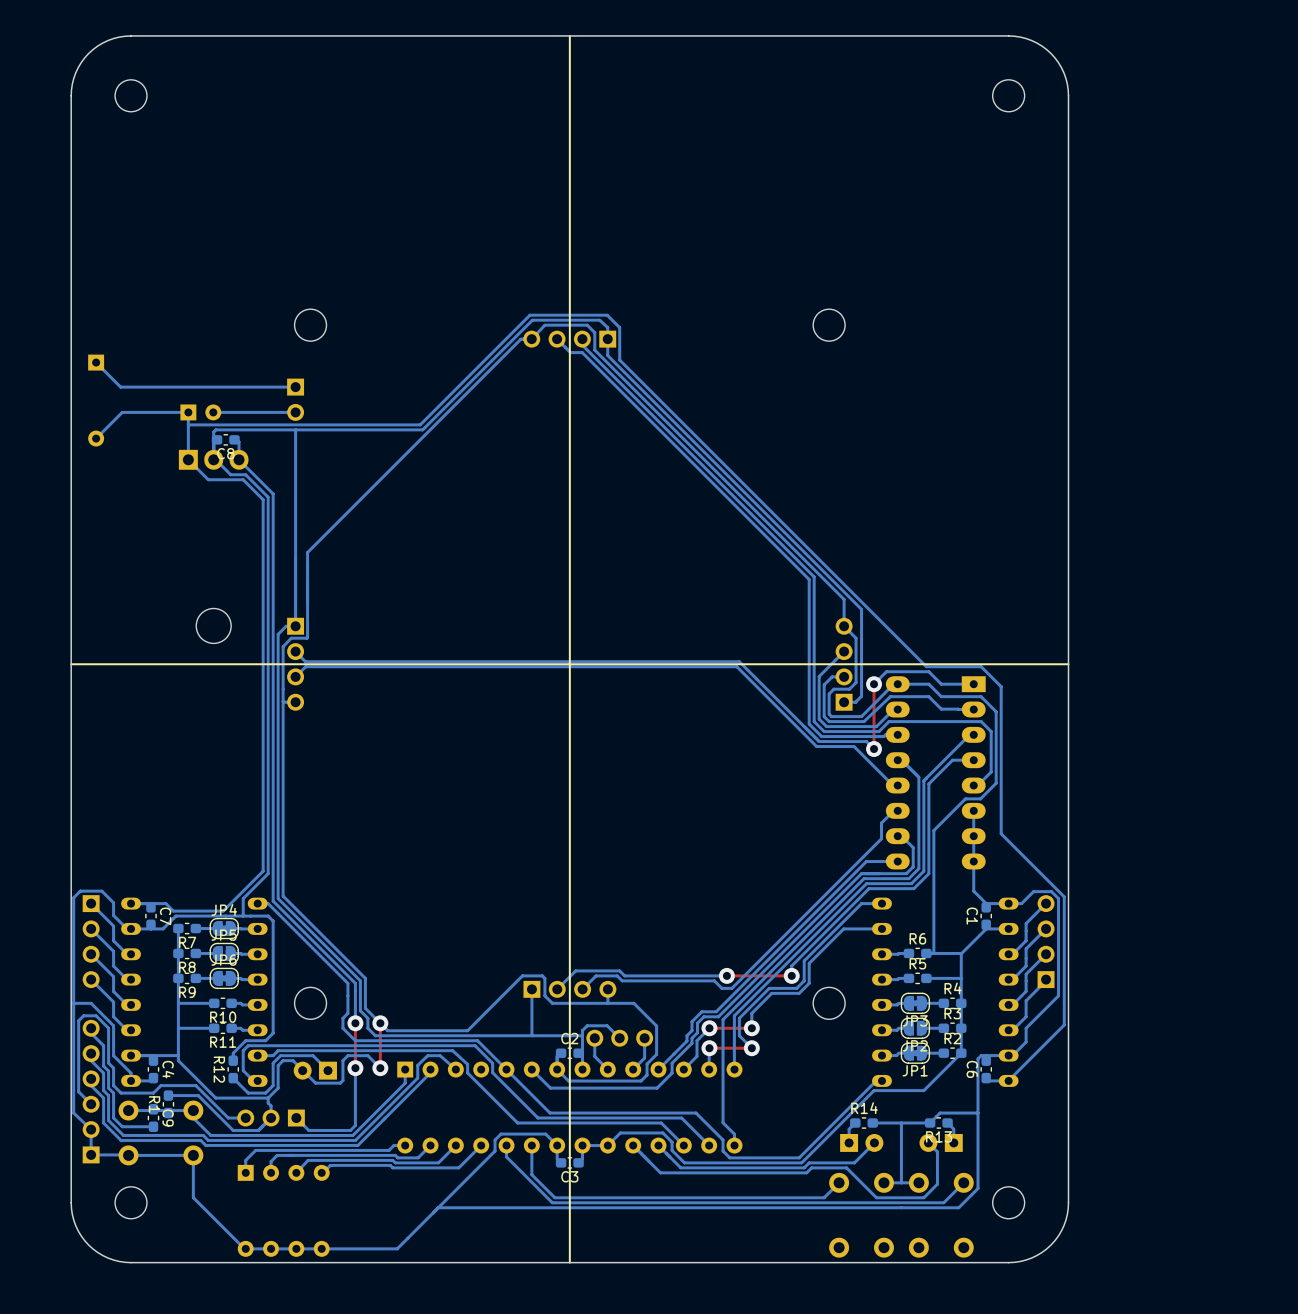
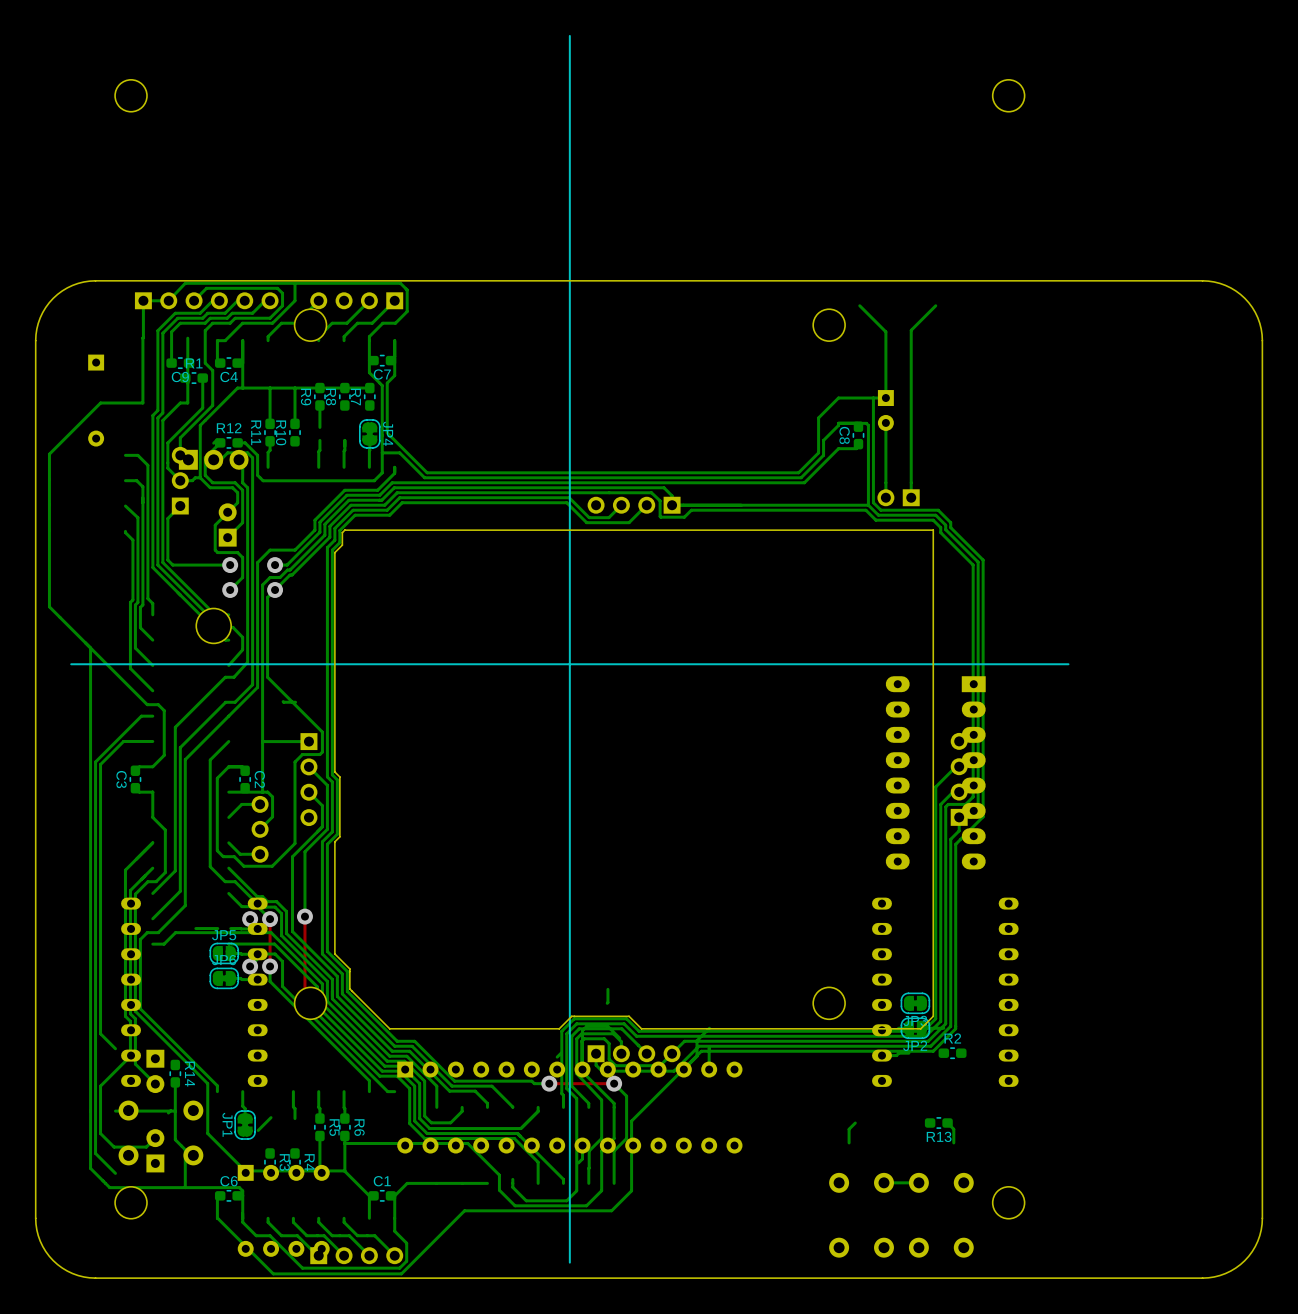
board edge: (1008, 35) (131, 35) (119, 37) (102, 43) (84, 57) (75, 72) (71, 95) (71, 1202) (75, 1225) (84, 1240) (93, 1249) (108, 1258) (131, 1262) (1008, 1262) (1031, 1258) (1046, 1249) (1054, 1240) (1065, 1220) (1068, 1202) (1068, 95) (1063, 72) (1050, 53) (1031, 40) (1008, 35) -> (1202, 280) (1225, 285) (1244, 298) (1257, 317) (1262, 340) (1262, 1218) (1259, 1235) (1255, 1246) (1240, 1264) (1225, 1273) (1202, 1278) (95, 1278) (72, 1273) (62, 1268) (49, 1256) (40, 1241) (35, 1218) (35, 340) (40, 317) (49, 302) (57, 294) (72, 285) (95, 280) (1202, 280)
bottom track: none -> (295, 283) (295, 300) (272, 323) (242, 323) (225, 340) (217, 340) (217, 360) (220, 363)
bottom track: none -> (194, 300) (206, 288) (277, 288) (282, 293) (282, 305) (270, 318) (235, 318) (230, 323) (212, 323) (205, 330) (205, 363) (212, 370) (212, 405) (180, 437) (180, 455)
part: none -> (206, 300)
bottom track: none -> (219, 300) (212, 300) (200, 313) (175, 313) (157, 330) (157, 410) (152, 415) (152, 567) (225, 640) (228, 640)
bottom track: none -> (244, 300) (237, 300) (225, 313) (207, 313) (202, 318) (177, 318) (162, 333) (162, 412) (157, 417) (157, 565) (220, 627) (232, 627) (242, 637) (242, 649) (228, 665)
bottom track: none -> (270, 300) (265, 300) (252, 313) (232, 313) (227, 318) (210, 318) (205, 323) (180, 323) (171, 331) (171, 363)
bottom track: none -> (318, 300) (296, 323) (281, 323) (268, 336) (268, 340)
part: none -> (356, 300)
bottom track: none -> (369, 300) (346, 323) (332, 323) (318, 336) (318, 340)
bottom track: none -> (394, 300) (372, 323) (357, 323) (344, 336) (344, 340)
bottom track: none -> (859, 305) (885, 331) (885, 398) (838, 398) (818, 417) (818, 452) (798, 472) (427, 472) (387, 432) (387, 383) (394, 375) (394, 340)
bottom track: none -> (935, 305) (911, 330) (911, 497)
bottom track: none -> (142, 338) (142, 403) (100, 403) (49, 454) (49, 606) (147, 704) (158, 704) (164, 710) (164, 755) (152, 766) (139, 766) (135, 770)
bottom track: none -> (142, 338) (143, 300) (168, 300) (185, 283) (400, 283) (407, 290) (407, 311) (395, 323) (382, 323) (369, 336) (369, 372) (382, 385) (382, 472) (374, 480) (263, 480) (257, 475) (257, 455) (245, 442) (237, 442)
bottom track: none -> (187, 338) (187, 403) (180, 403) (162, 420) (162, 562) (215, 614) (228, 614)
bottom track: (557, 339) (570, 352) (582, 352) (809, 579) (809, 724) (821, 736) (897, 734) -> none
part: (569, 339) -> none
bottom track: (582, 339) (582, 345) (814, 576) (814, 721) (824, 731) (879, 731) (888, 721) (981, 721) (991, 731) (991, 772) (977, 785) (969, 785) -> none
bottom track: none -> (242, 340) (242, 387)
bottom track: (96, 362) (120, 387) (295, 387) -> none
bottom track: none -> (202, 378) (202, 407) (167, 442) (167, 468) (180, 480) (192, 480) (195, 477) (200, 477)
bottom track: none -> (270, 388) (270, 423)
bottom track: none -> (295, 388) (295, 423)
bottom track: none -> (369, 388) (237, 388) (200, 425) (200, 477)
bottom track: none -> (873, 398) (873, 502) (880, 510) (938, 510) (950, 522) (950, 527) (983, 560) (983, 816) (955, 844) (955, 1028) (933, 1051) (701, 1051) (631, 1121) (631, 1190) (611, 1210) (464, 1210) (401, 1273) (273, 1273) (217, 1218) (217, 1198) (220, 1195)
part: (295, 399) -> none
bottom track: none -> (319, 405) (319, 427)
part: none -> (885, 410)
part: (200, 412) -> none
bottom track: (295, 412) (213, 412) -> none
bottom track: none -> (885, 422) (885, 497)
bottom track: (188, 424) (420, 424) (529, 315) (607, 315) (619, 327) (619, 360) (926, 666) (981, 666) (1001, 686) (1001, 833) (1064, 896) (1064, 1025) (1008, 1080) (989, 1080) (986, 1078) -> none
bottom track: (295, 429) (295, 626) (286, 626) (278, 634) (278, 898) (360, 980) (360, 1010) (367, 1018) (367, 1028) (375, 1035) (582, 1035) -> none
bottom track: (234, 437) (239, 441) (239, 459) (273, 493) (273, 901) (355, 983) (355, 1023) -> none
bottom track: (96, 438) (122, 412) (188, 412) (188, 459) (208, 479) (243, 479) (263, 499) (263, 871) (223, 911) (173, 911) (165, 903) (131, 903) -> none
C8 rotation: 0° (225, 439) -> 90° clockwise (858, 435)
C8 position: (225, 439) -> (858, 435)
bottom track: none -> (319, 440) (318, 467)
bottom track: none -> (344, 440) (344, 467)
bottom track: none -> (369, 440) (369, 467)
bottom track: none -> (270, 441) (268, 467)
bottom track: none -> (220, 442) (205, 457) (205, 475) (212, 482) (235, 482) (242, 490) (242, 522) (227, 537)
bottom track: none -> (860, 444) (856, 448) (838, 448) (804, 482) (392, 482) (379, 495) (346, 495) (319, 522) (319, 532) (287, 565) (275, 565)
bottom track: none -> (382, 452) (399, 452) (424, 477) (801, 477) (823, 455) (823, 440) (838, 423) (866, 423) (868, 425) (868, 505)
bottom track: none -> (125, 455) (137, 455) (147, 465) (147, 598) (152, 603) (152, 614)
bottom track: none -> (217, 467) (217, 463) (227, 452) (247, 452) (252, 457) (252, 684) (235, 702) (225, 702) (180, 747) (180, 891) (152, 918)
bottom track: none -> (242, 467) (242, 482) (247, 487) (247, 662) (233, 677) (225, 677) (175, 727) (175, 870) (152, 893)
bottom track: none -> (394, 467) (394, 473) (377, 490) (344, 490) (314, 520) (314, 530) (295, 550) (270, 550) (257, 562) (257, 687) (185, 759) (185, 905) (158, 932) (147, 932) (140, 939) (140, 1008) (217, 1085) (217, 1091)
bottom track: none -> (200, 477) (210, 487) (232, 487) (237, 492) (237, 502) (215, 525) (215, 550) (217, 552) (237, 552) (242, 557) (242, 577) (230, 589)
bottom track: none -> (125, 480) (136, 480) (142, 486) (142, 604) (140, 607) (140, 627) (152, 640)
part: none -> (180, 480)
part: none -> (898, 497)
bottom track: none -> (621, 505) (608, 517) (589, 517) (569, 497) (399, 497) (387, 510) (353, 510) (334, 528) (334, 540) (327, 547) (327, 776) (332, 781) (332, 831) (322, 841) (322, 954) (342, 973) (342, 993) (394, 1046) (412, 1046) (452, 1086) (491, 1086) (512, 1107)
part: none -> (634, 505)
bottom track: none -> (646, 505) (629, 522) (586, 522) (566, 502) (402, 502) (389, 515) (355, 515) (339, 530) (339, 542) (332, 550) (332, 774) (337, 779) (337, 834) (327, 844) (327, 951) (347, 971) (347, 991) (397, 1041) (414, 1041) (454, 1081) (531, 1081) (534, 1083) (549, 1083)
bottom track: none -> (868, 505) (672, 505) (672, 495) (664, 487) (394, 487) (381, 500) (348, 500) (324, 524) (324, 535) (290, 570) (280, 577) (270, 577) (262, 585) (262, 792)
bottom track: none -> (868, 505) (878, 515) (935, 515) (945, 525) (945, 529) (978, 562) (978, 809) (970, 817) (959, 817) (959, 830) (950, 839) (950, 1026) (930, 1046) (698, 1046) (673, 1071) (602, 1071) (596, 1065) (596, 1053)
bottom track: none -> (125, 506) (137, 517) (137, 602) (135, 604) (135, 648) (152, 665)
bottom track: none -> (180, 506) (167, 518) (167, 560) (172, 565) (230, 565)
part: none -> (227, 524)
board edge: none -> (933, 530) (933, 1016) (920, 1028) (641, 1028) (629, 1016) (571, 1016) (559, 1028) (389, 1028) (349, 988) (349, 968) (334, 954) (334, 841) (339, 836) (339, 776) (334, 772) (334, 552) (342, 545) (342, 532) (344, 530) (933, 530)
bottom track: none -> (125, 531) (132, 540) (130, 668) (152, 690)
via: none -> (230, 565)
via: none -> (275, 565)
via: none -> (230, 589)
via: none -> (275, 589)
bottom track: none -> (90, 647) (90, 1168) (109, 1187) (239, 1187) (242, 1190) (242, 1222) (256, 1235) (270, 1235) (302, 1268) (399, 1268) (406, 1261) (406, 1243) (394, 1231) (394, 1195) (407, 1183) (487, 1183)
bottom track: (295, 651) (305, 661) (739, 661) (819, 741) (866, 741) (874, 749) -> none
bottom track: (844, 651) (819, 676) (819, 719) (826, 726) (876, 726) (893, 709) (897, 709) -> none
part position: (295, 664) -> (308, 779)
part: (844, 664) -> none
bottom track: (295, 676) (305, 666) (736, 666) (816, 746) (854, 746) (893, 785) (897, 785) -> none
bottom track: (844, 676) (832, 676) (824, 684) (824, 716) (829, 721) (864, 721) (890, 696) (928, 696) (941, 709) (973, 709) -> none
top track: (874, 684) (874, 749) -> none
via: (874, 684) -> none
bottom track: (973, 684) (941, 684) (928, 671) (886, 671) (874, 684) -> none
bottom track: (844, 702) (855, 702) (861, 696) (861, 609) (607, 355) (607, 327) (599, 320) (532, 320) (422, 429) (215, 429) (213, 431) (213, 459) (230, 474) (245, 474) (268, 497) (268, 873) (243, 898) (243, 916) -> none
bottom track: none -> (152, 716) (141, 716) (95, 762) (95, 1153) (115, 1173)
bottom track: (973, 734) (969, 734) (923, 780) (923, 871) (911, 883) (866, 883) (734, 1015) (734, 1069) -> none
bottom track: none -> (152, 741) (123, 741) (100, 764) (100, 1033) (115, 1048)
bottom track: none -> (228, 741) (210, 760) (210, 866) (225, 881) (235, 881) (255, 901) (260, 901) (265, 907) (275, 907) (281, 913) (281, 935) (327, 981) (327, 1001) (387, 1061) (404, 1061) (424, 1081) (424, 1116) (431, 1122) (450, 1122) (462, 1111) (462, 1107)
bottom track: none -> (308, 741) (262, 742)
via: (874, 749) -> none
bottom track: (897, 760) (901, 760) (918, 777) (918, 868) (908, 878) (864, 878) (723, 1019) (723, 1122) (734, 1134) (734, 1145) -> none
bottom track: (973, 760) (952, 760) (928, 783) (928, 873) (913, 888) (869, 888) (791, 965) (791, 975) -> none
bottom track: none -> (308, 766) (327, 785) (327, 829) (304, 851) (304, 916)
bottom track: none -> (959, 766) (956, 766) (935, 786) (935, 1018) (923, 1031) (639, 1031) (626, 1018) (574, 1018) (561, 1031) (563, 1107)
bottom track: none -> (245, 769) (242, 766) (228, 766) (217, 778) (217, 850) (223, 856) (234, 856) (243, 866) (272, 866) (295, 843) (295, 762) (302, 754) (319, 754) (322, 752) (322, 732) (267, 677) (267, 597) (329, 537) (329, 526) (351, 505) (384, 505) (397, 492) (651, 492) (660, 500) (660, 517) (684, 517) (691, 510) (865, 510) (875, 520) (933, 520) (940, 527) (940, 532) (973, 565) (973, 796) (965, 804) (948, 804) (945, 806) (945, 1023) (928, 1041) (684, 1041) (660, 1065) (615, 1065) (609, 1059) (609, 1043) (604, 1038) (584, 1038) (581, 1041) (581, 1071) (614, 1103) (614, 1138) (601, 1150) (601, 1190) (586, 1205) (515, 1205) (499, 1190) (499, 1175) (467, 1143) (344, 1143)
part: none -> (959, 779)
bottom track: none -> (135, 788) (139, 792) (152, 792)
bottom track: none -> (152, 792) (152, 817) (165, 830) (165, 872) (156, 881) (147, 881) (135, 894) (135, 1011) (207, 1083) (207, 1133) (245, 1170) (344, 1170)
bottom track: none -> (228, 792) (267, 792) (272, 796) (272, 816) (260, 829)
bottom track: none -> (308, 792) (322, 805) (322, 826) (292, 856) (292, 931) (337, 976) (337, 996) (392, 1051) (409, 1051) (449, 1091) (475, 1091) (487, 1103) (487, 1107)
bottom track: none -> (959, 792) (953, 792) (940, 804) (940, 1021) (925, 1036) (636, 1036) (624, 1023) (576, 1023) (566, 1033) (566, 1088) (576, 1098) (576, 1190) (566, 1200) (526, 1200) (512, 1187) (512, 1179)
bottom track: none -> (260, 804) (241, 804) (228, 817)
bottom track: (897, 810) (893, 810) (881, 823) (881, 838) (731, 988) (721, 988) (714, 980) (622, 980) (617, 975) (596, 975) (582, 989) -> none
bottom track: (973, 810) (973, 891) (986, 903) (1021, 903) (1033, 891) (1051, 891) (1058, 898) (1058, 995) (1026, 1028) (1026, 1042) (1012, 1055) (981, 1055) (978, 1058) (978, 1188) (958, 1207) (438, 1207) -> none
part: none -> (260, 829)
bottom track: (897, 836) (901, 836) (913, 847) (913, 866) (906, 873) (861, 873) (718, 1016) (703, 1016) (697, 1023) (697, 1032) (692, 1038) (692, 1043) (672, 1063) (672, 1073) (657, 1088) (550, 1088) (531, 1069) -> none
bottom track: none -> (152, 842) (125, 870) (125, 1016) (130, 1021) (130, 1056) (100, 1086) (100, 1133) (114, 1147) (146, 1147) (155, 1138)
bottom track: none -> (228, 842) (240, 854) (260, 854)
bottom track: (897, 861) (866, 861) (716, 1011) (701, 1011) (692, 1021) (692, 1030) (687, 1035) (687, 1041) (658, 1069) -> none
bottom track: none -> (152, 868) (130, 890) (130, 1013) (135, 1018) (135, 1064) (155, 1084)
bottom track: none -> (228, 868) (257, 896) (262, 896) (267, 901) (276, 901) (286, 911) (286, 933) (332, 979) (332, 998) (389, 1056) (406, 1056) (436, 1086) (436, 1107)
bottom track: none -> (228, 893) (241, 906) (257, 906) (270, 919)
bottom track: (91, 903) (113, 926) (113, 940) (127, 954) (131, 954) -> none
bottom track: (257, 903) (268, 903) (347, 983) (347, 1013) (342, 1018) (342, 1028) (355, 1040) (477, 1040) (506, 1069) -> none
bottom track: (882, 903) (861, 903) (804, 960) (804, 980) (796, 988) (769, 988) (739, 1018) (739, 1035) (751, 1048) -> none
bottom track: (1046, 903) (1026, 923) (1026, 940) (1012, 954) (1008, 954) -> none
C7 rotation: 0° (150, 916) -> 90° clockwise (382, 360)
C7 position: (150, 916) -> (382, 360)
top track: none -> (304, 916) (304, 991)
via: none -> (304, 916)
C1 rotation: 0° (986, 916) -> 90° clockwise (382, 1195)
C1 position: (986, 916) -> (382, 1195)
via: none -> (250, 919)
via: none -> (270, 919)
bottom track: (91, 928) (113, 951) (113, 966) (127, 979) (131, 979) -> none
bottom track: (178, 928) (178, 1060) (215, 1098) (268, 1098) -> none
R7 rotation: 0° (187, 928) -> 90° clockwise (369, 396)
R7 position: (187, 928) -> (369, 396)
JP4 rotation: 0° (224, 928) -> 90° clockwise (369, 433)
JP4 position: (224, 928) -> (369, 433)
bottom track: (882, 928) (843, 928) (809, 963) (809, 983) (799, 993) (771, 993) (751, 1013) (751, 1028) -> none
bottom track: (1008, 928) (986, 928) (961, 953) -> none
bottom track: (1046, 928) (1026, 948) (1026, 966) (1012, 979) (1008, 979) -> none
part: (91, 941) -> none
part: (1046, 941) -> none
bottom track: none -> (152, 944) (164, 944) (175, 932) (271, 932) (322, 983) (322, 1003) (384, 1066) (402, 1066) (419, 1083) (419, 1118) (429, 1128) (520, 1128) (538, 1111) (538, 1107)
bottom track: none -> (228, 944) (274, 944) (317, 986) (317, 1006) (382, 1071) (399, 1071) (414, 1086) (414, 1121) (427, 1133) (517, 1133) (563, 1179) (563, 1183)
R8 rotation: 0° (187, 953) -> 90° clockwise (344, 396)
R8 position: (187, 953) -> (344, 396)
bottom track: (217, 953) (195, 953) -> none
bottom track: (908, 953) (882, 954) -> none
R6 rotation: 0° (917, 953) -> 90° clockwise (344, 1127)
R6 position: (917, 953) -> (344, 1127)
bottom track: (926, 953) (961, 953) -> none
bottom track: (933, 953) (933, 830) (965, 798) (980, 798) (996, 783) (996, 711) (981, 696) (941, 696) (928, 684) (893, 684) (861, 716) (831, 716) (829, 714) (829, 693) (833, 689) (849, 689) (856, 682) (856, 638) (844, 626) (844, 599) (594, 350) (594, 332) (587, 325) (544, 325) (531, 339) (520, 339) (307, 552) (307, 637) (291, 638) (283, 646) (283, 896) (365, 978) (365, 1008) (387, 1030) (467, 1030) (522, 975) (542, 975) (544, 978) (544, 995) (552, 1003) (633, 1003) (656, 1026) (656, 1054) (647, 1064) (647, 1075) (641, 1081) (568, 1081) (557, 1069) (557, 1055) (559, 1053) -> none
bottom track: (961, 953) (961, 1053) (923, 1090) (874, 1090) (801, 1162) (684, 1162) (672, 1150) (672, 1142) (662, 1132) (620, 1132) (607, 1145) (582, 1145) -> none
bottom track: (91, 954) (113, 976) (113, 991) (127, 1004) (131, 1004) -> none
bottom track: (1046, 954) (1026, 974) (1026, 991) (1012, 1004) (1008, 1004) -> none
bottom track: none -> (270, 963) (270, 981) (369, 1080) (369, 1091)
bottom track: none -> (250, 966) (262, 954) (275, 954) (282, 961) (282, 986) (387, 1091) (394, 1091)
via: none -> (250, 966)
via: none -> (270, 966)
bottom track: (726, 975) (624, 975) (619, 970) (575, 970) (557, 989) -> none
via: (726, 975) -> none
top track: (791, 975) (726, 975) -> (614, 1083) (549, 1083)
via: (791, 975) -> none
R9 rotation: 0° (187, 978) -> 90° clockwise (319, 396)
R9 position: (187, 978) -> (319, 396)
bottom track: (217, 978) (195, 978) -> none
bottom track: (908, 978) (882, 979) -> none
R5 rotation: 0° (917, 978) -> 90° clockwise (319, 1127)
R5 position: (917, 978) -> (319, 1127)
bottom track: (961, 978) (926, 978) -> none
bottom track: (91, 979) (113, 1002) (113, 1016) (127, 1030) (131, 1030) -> none
bottom track: (1048, 979) (1026, 1000) (1026, 1016) (1012, 1030) (1008, 1030) -> none
bottom track: (531, 989) (532, 1035) -> none
part position: (569, 989) -> (634, 1053)
bottom track: none -> (304, 991) (304, 1001) (379, 1076) (397, 1076) (409, 1088) (409, 1123) (424, 1138) (514, 1138) (538, 1162) (538, 1183)
bottom track: (73, 1003) (91, 1003) (113, 1025) (113, 1055) (131, 1073) (131, 1080) (150, 1080) (153, 1078) -> none
bottom track: (214, 1003) (178, 1003) -> none
R10 rotation: 0° (222, 1003) -> 90° clockwise (295, 432)
R10 position: (222, 1003) -> (295, 432)
bottom track: (231, 1003) (257, 1004) -> none
bottom track: (908, 1003) (882, 1004) -> none
bottom track: (943, 1003) (921, 1003) -> none
R4 rotation: 0° (952, 1003) -> 90° clockwise (295, 1162)
R4 position: (952, 1003) -> (295, 1162)
top track: (355, 1023) (355, 1068) -> (270, 919) (270, 963)
via: (355, 1023) -> none
top track: (380, 1023) (380, 1068) -> none
via: (380, 1023) -> none
bottom track: (91, 1028) (91, 1033) (103, 1045) (103, 1066) (108, 1071) (108, 1088) (113, 1093) (113, 1118) (122, 1126) (153, 1126) -> none
bottom track: (214, 1028) (178, 1028) -> none
R11 rotation: 0° (222, 1028) -> 90° clockwise (270, 432)
R11 position: (222, 1028) -> (270, 432)
bottom track: (231, 1028) (257, 1030) -> none
via: (709, 1028) -> none
top track: (751, 1028) (709, 1028) -> none
via: (751, 1028) -> none
R3 rotation: 0° (952, 1028) -> 90° clockwise (270, 1162)
R3 position: (952, 1028) -> (270, 1162)
bottom track: (594, 1038) (594, 1056) (607, 1069) -> none
part: (619, 1038) -> none
bottom track: (644, 1038) (644, 1058) (633, 1069) -> none
via: (709, 1048) -> none
top track: (751, 1048) (709, 1048) -> none
via: (751, 1048) -> none
bottom track: (91, 1053) (91, 1060) (103, 1073) (103, 1090) (108, 1095) (108, 1120) (123, 1135) (203, 1135) (208, 1140) (355, 1140) (417, 1078) (417, 1065) (427, 1055) (440, 1055) (455, 1069) -> none
C2 rotation: 0° (569, 1053) -> 90° clockwise (245, 779)
C2 position: (569, 1053) -> (245, 779)
bottom track: none -> (621, 1053) (621, 1041) (613, 1033) (581, 1033) (576, 1038) (576, 1073) (601, 1100) (601, 1138) (589, 1150) (588, 1183)
bottom track: none -> (646, 1053) (621, 1028) (579, 1028) (571, 1036) (571, 1086) (588, 1103) (588, 1107)
JP1 rotation: 0° (915, 1053) -> 90° clockwise (245, 1125)
JP1 position: (915, 1053) -> (245, 1125)
bottom track: (943, 1053) (921, 1053) -> none
bottom track: (178, 1055) (131, 1055) -> none
bottom track: (257, 1055) (273, 1055) (278, 1050) (452, 1050) (467, 1064) (467, 1072) (517, 1123) (661, 1123) (683, 1145) -> none
bottom track: (233, 1060) (233, 1053) (245, 1040) (265, 1040) (273, 1033) (273, 921) (268, 916) (175, 916) (163, 928) (127, 928) (113, 915) (113, 902) (101, 891) (80, 891) (73, 897) (73, 1113) (91, 1129) (91, 1154) (193, 1155) (193, 1197) (244, 1248) (397, 1248) (495, 1151) (495, 1140) (501, 1134) (545, 1134) (557, 1145) (557, 1158) (561, 1162) -> none
bottom track: (355, 1068) (355, 1125) (350, 1130) (308, 1130) (296, 1118) -> none
via: (355, 1068) -> none
bottom track: (380, 1068) (367, 1055) (347, 1055) (342, 1060) (342, 1080) (340, 1083) (315, 1083) (293, 1060) (283, 1060) (278, 1065) (278, 1088) (268, 1098) -> none
via: (380, 1068) -> none
C4 rotation: 0° (153, 1069) -> 90° clockwise (228, 363)
C4 position: (153, 1069) -> (228, 363)
R12 rotation: 0° (233, 1069) -> 90° clockwise (228, 442)
R12 position: (233, 1069) -> (228, 442)
bottom track: (405, 1069) (405, 1083) (352, 1135) (210, 1135) (193, 1118) (193, 1110) (128, 1110) -> none
bottom track: (430, 1069) (430, 1072) (357, 1145) (205, 1145) (200, 1140) (121, 1140) (103, 1123) (103, 1098) (91, 1085) (91, 1078) -> none
bottom track: (506, 1069) (550, 1113) (696, 1113) (723, 1140) (723, 1151) (729, 1157) (799, 1157) (876, 1080) (882, 1080) -> none
C6 rotation: 0° (986, 1069) -> 90° clockwise (228, 1195)
C6 position: (986, 1069) -> (228, 1195)
part: (315, 1070) -> none
bottom track: (328, 1070) (313, 1055) (280, 1055) (273, 1063) (273, 1085) (265, 1093) (248, 1093) (233, 1078) -> none
part: none -> (155, 1071)
bottom track: (257, 1080) (253, 1080) (243, 1070) (243, 1050) (248, 1045) (475, 1045) (492, 1063) (492, 1072) (538, 1118) (681, 1118) (709, 1145) -> none
bottom track: none -> (175, 1082) (175, 1139) (185, 1149) (185, 1187)
via: none -> (549, 1083)
bottom track: none -> (614, 1083) (626, 1096) (626, 1138) (614, 1150) (614, 1183)
via: none -> (614, 1083)
part: (91, 1091) -> none
bottom track: none -> (242, 1091) (245, 1118)
bottom track: none -> (293, 1091) (295, 1118)
bottom track: none -> (318, 1091) (319, 1118)
bottom track: none -> (344, 1091) (344, 1118)
bottom track: (168, 1095) (198, 1095) (233, 1130) (258, 1130) (271, 1118) (271, 1105) (268, 1103) (268, 1098) -> none
bottom track: (91, 1104) (78, 1091) (78, 1020) (83, 1015) (96, 1015) (108, 1028) (108, 1063) (113, 1068) (113, 1085) (121, 1093) (153, 1093) (160, 1085) (195, 1085) (228, 1118) (245, 1118) -> none
R1 rotation: 0° (168, 1104) -> 90° clockwise (194, 378)
R1 position: (168, 1104) -> (194, 378)
bottom track: none -> (175, 1111) (115, 1111)
bottom track: (978, 1113) (940, 1113) (930, 1123) (872, 1123) -> none
C9 rotation: 0° (153, 1118) -> 90° clockwise (180, 363)
C9 position: (153, 1118) -> (180, 363)
part: (271, 1118) -> none
R14 rotation: 0° (864, 1123) -> 90° clockwise (175, 1073)
R14 position: (864, 1123) -> (175, 1073)
bottom track: (901, 1123) (901, 1182) -> none
bottom track: none -> (319, 1136) (319, 1170)
bottom track: none -> (344, 1136) (344, 1170)
part: (861, 1142) -> none
bottom track: (874, 1142) (854, 1162) (809, 1162) (804, 1167) (680, 1167) (658, 1145) -> none
bottom track: (928, 1142) (937, 1151) (937, 1184) (923, 1197) (876, 1197) (846, 1167) (811, 1167) (806, 1172) (660, 1172) (633, 1145) -> none
part: (941, 1142) -> none
bottom track: (405, 1145) (393, 1145) (389, 1150) (255, 1150) (245, 1160) (245, 1172) -> none
bottom track: (430, 1145) (418, 1157) (397, 1157) (395, 1155) (277, 1155) (271, 1161) (271, 1172) -> none
bottom track: (455, 1145) (438, 1162) (395, 1162) (392, 1160) (308, 1160) (296, 1172) -> none
bottom track: (481, 1145) (458, 1167) (330, 1165) (321, 1172) -> none
bottom track: (506, 1145) (506, 1156) (552, 1202) (943, 1202) (963, 1182) -> none
bottom track: (531, 1145) (531, 1174) (554, 1197) (824, 1197) (839, 1182) -> none
part: none -> (155, 1150)
C3 rotation: 0° (569, 1162) -> 90° clockwise (135, 779)
C3 position: (569, 1162) -> (135, 779)
bottom track: none -> (344, 1170) (369, 1195) (369, 1218)
bottom track: none -> (268, 1218) (268, 1222) (281, 1235) (297, 1235) (318, 1258)
bottom track: none -> (293, 1218) (293, 1222) (306, 1235) (324, 1235) (344, 1255)
bottom track: none -> (318, 1218) (318, 1222) (332, 1235) (349, 1235) (369, 1255)
bottom track: none -> (344, 1218) (344, 1222) (357, 1235) (374, 1235) (394, 1255)
part: none -> (356, 1255)

